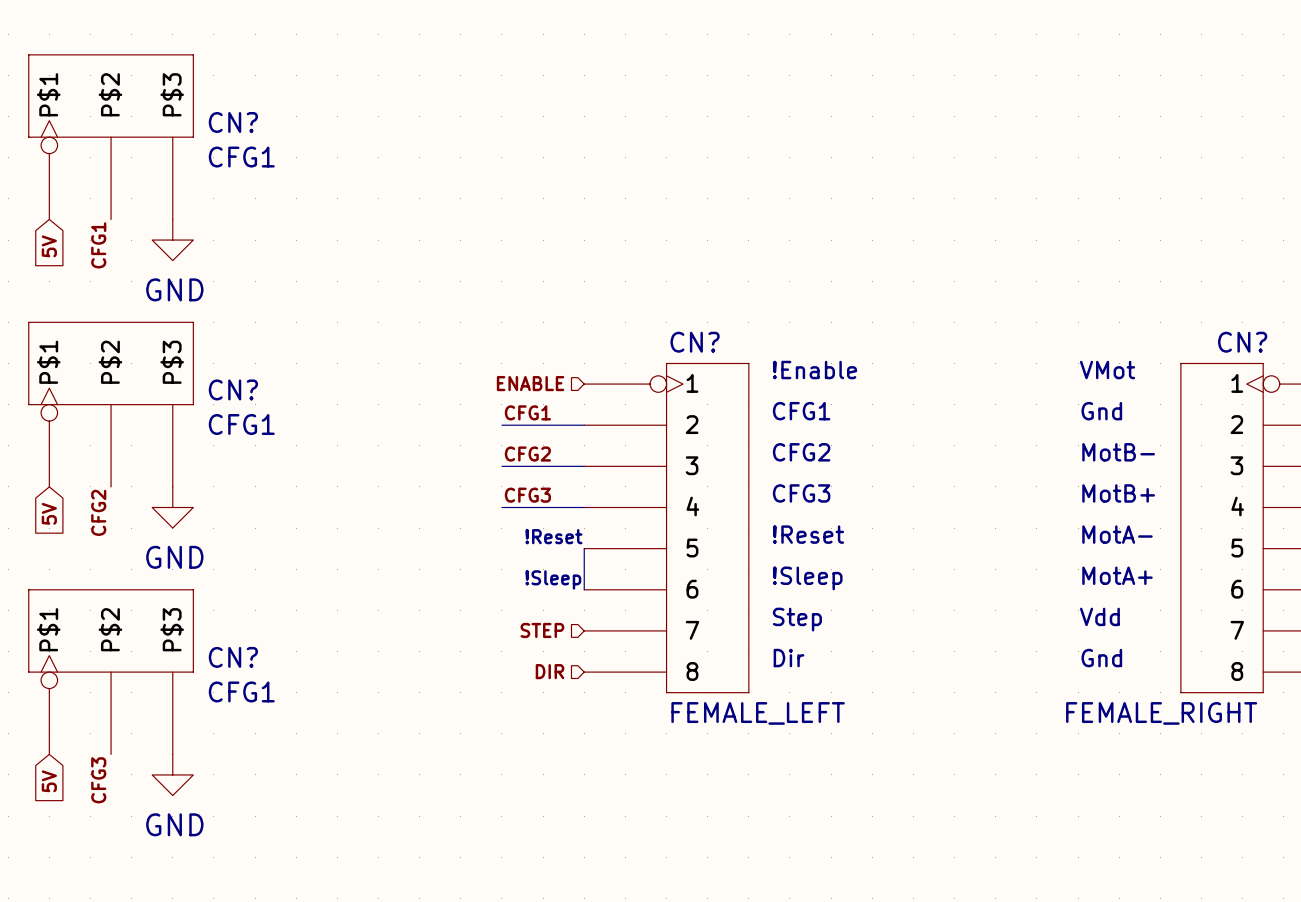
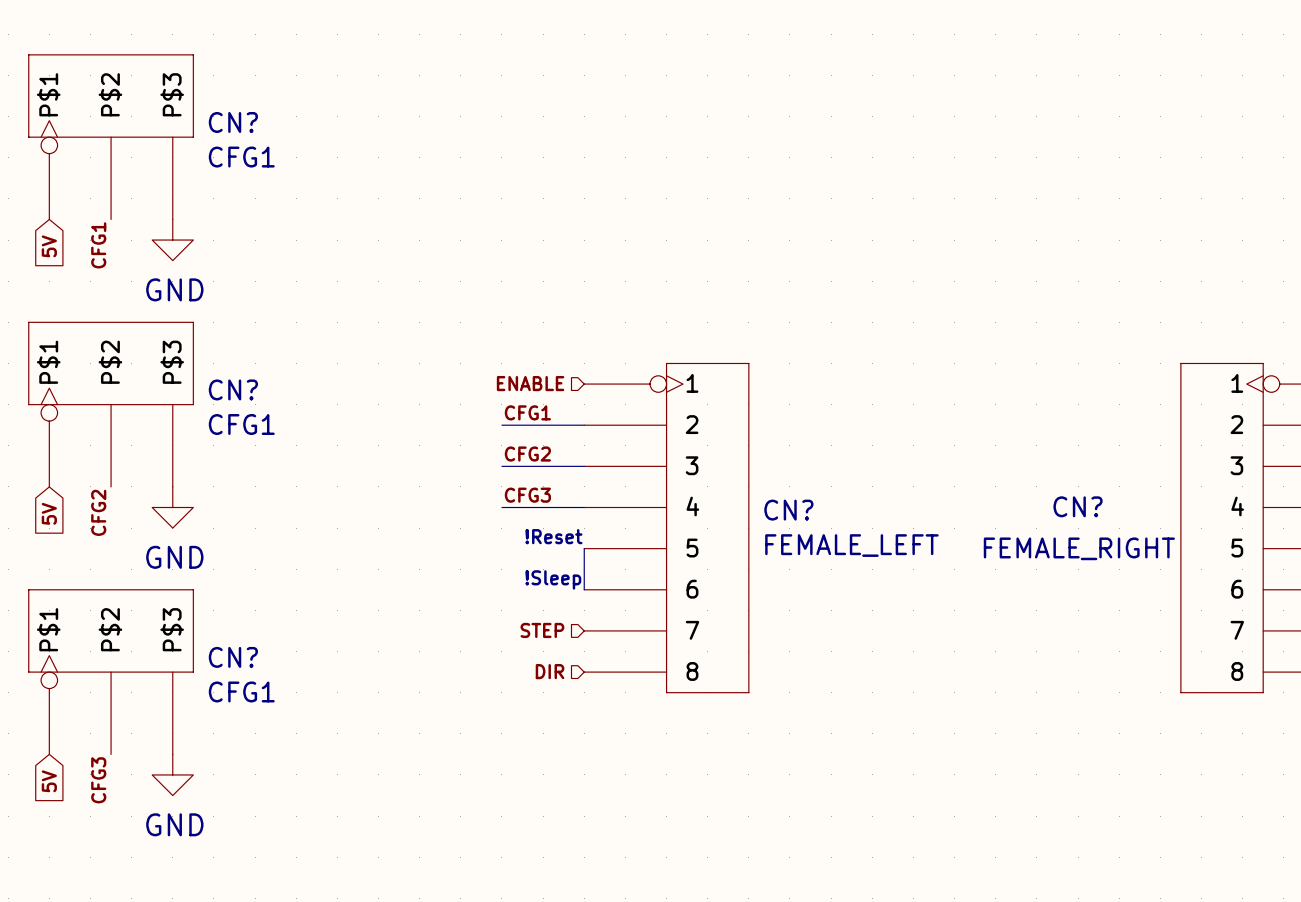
CN? name position: CN? (695, 342) -> CN? (788, 510)
CN? name position: CN? (1242, 342) -> CN? (1078, 506)
text: !Enable (814, 370) -> none
text: VMot (1107, 370) -> none
text: CFG1 (801, 411) -> none
text: Gnd (1101, 411) -> none
text: CFG2 (801, 452) -> none
text: MotB- (1118, 452) -> none
text: CFG3 (801, 493) -> none
text: MotB+ (1118, 493) -> none
text: !Reset (808, 534) -> none
text: MotA- (1117, 534) -> none
text: MotA+ (1117, 575) -> none
text: !Sleep (807, 578) -> none
text: Vdd (1099, 616) -> none
text: Step (797, 619) -> none
text: Dir (789, 658) -> none
text: Gnd (1101, 658) -> none
CN? value position: FEMALE_LEFT (758, 713) -> FEMALE_LEFT (851, 545)
CN? value position: FEMALE_RIGHT (1161, 713) -> FEMALE_RIGHT (1079, 548)

